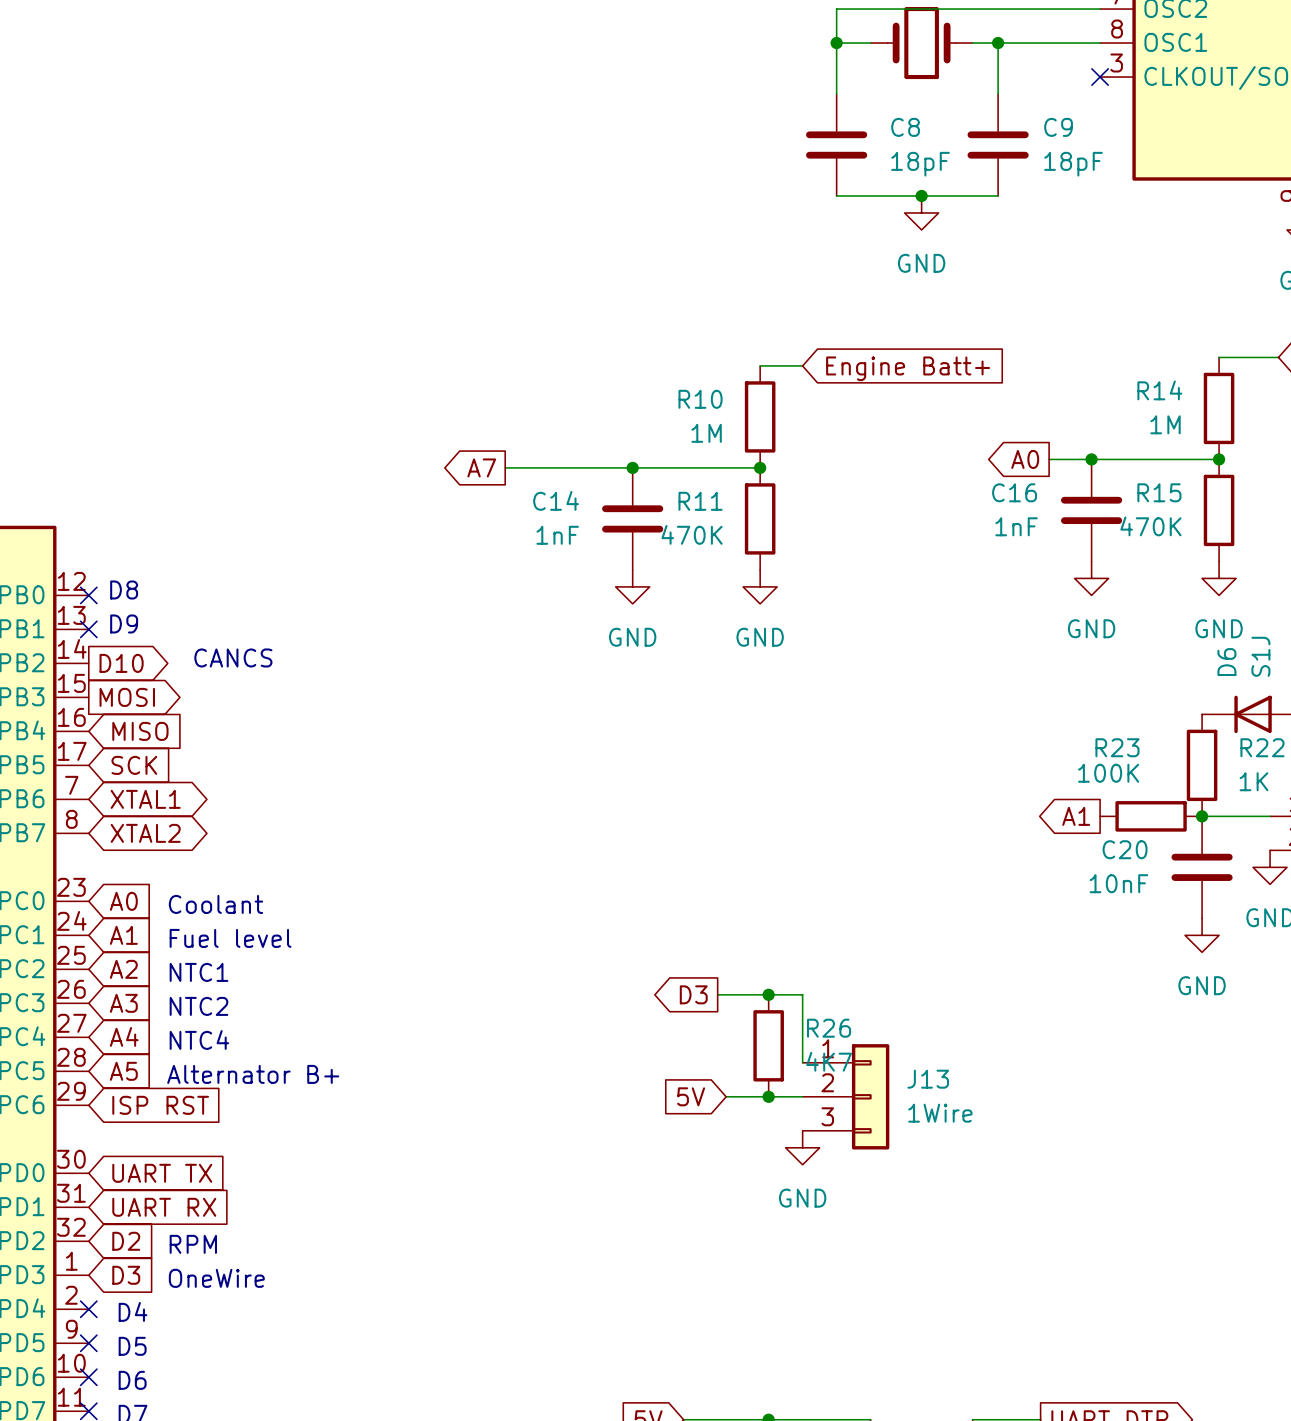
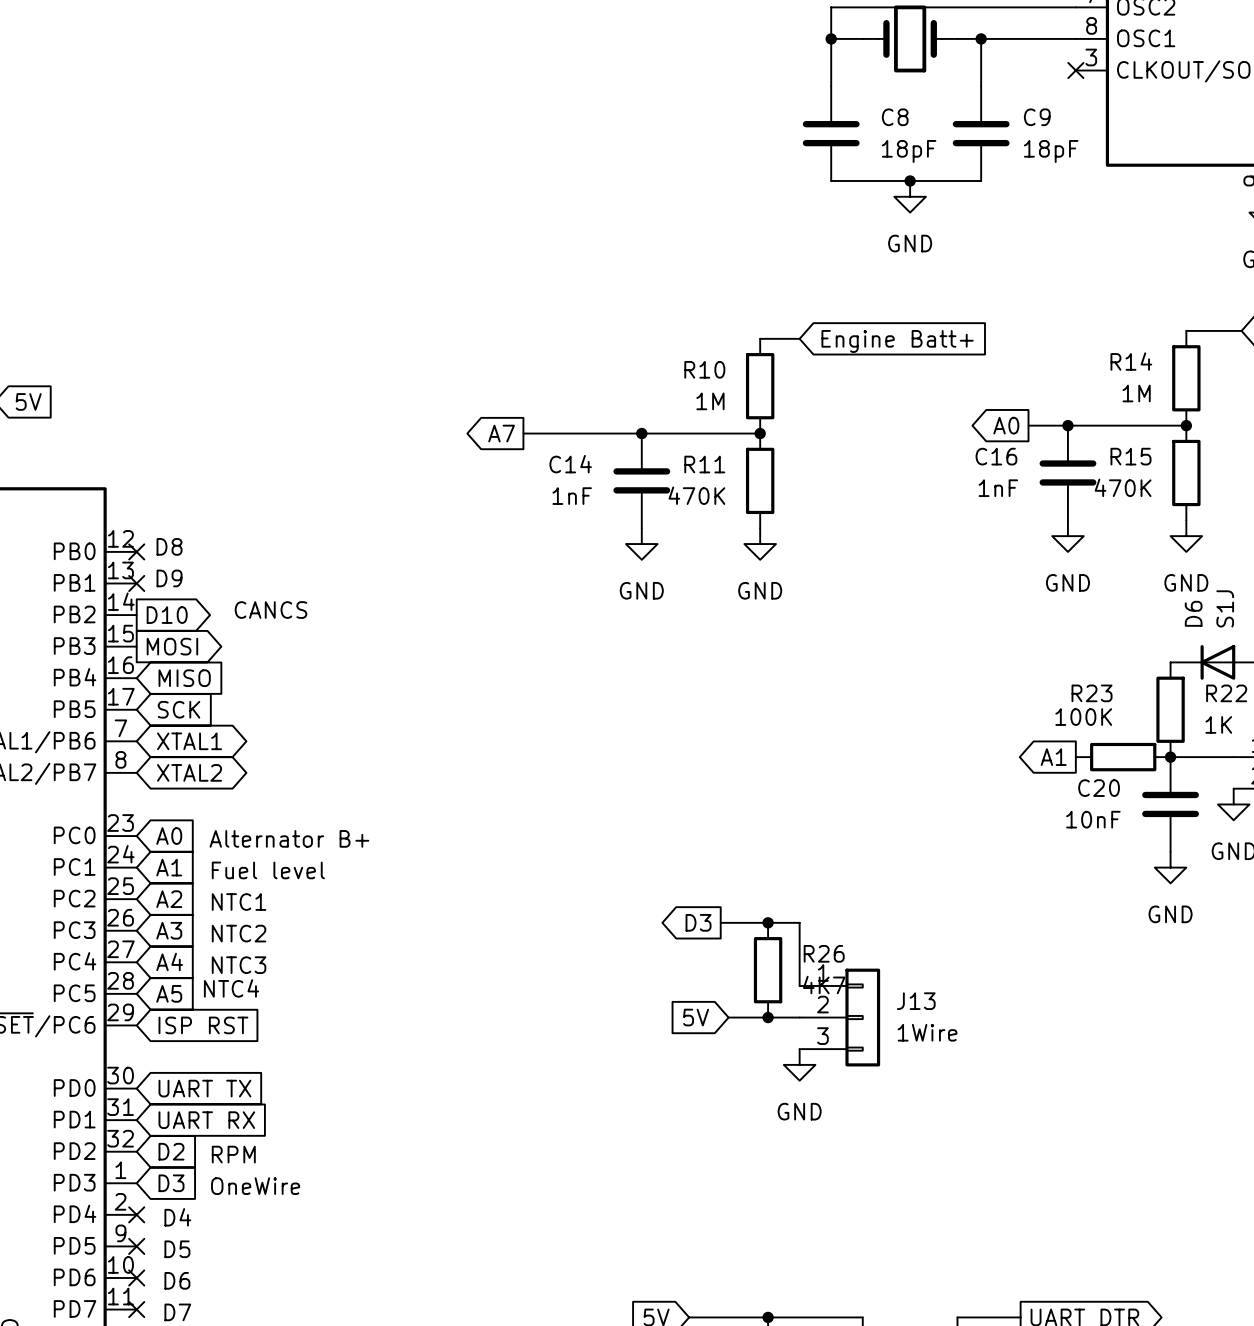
text: Coolant (215, 904) -> Alternator B+ (289, 838)
text: NTC4 (199, 1039) -> NTC3 (239, 965)
text: Alternator B+ (253, 1074) -> NTC4 (231, 988)

